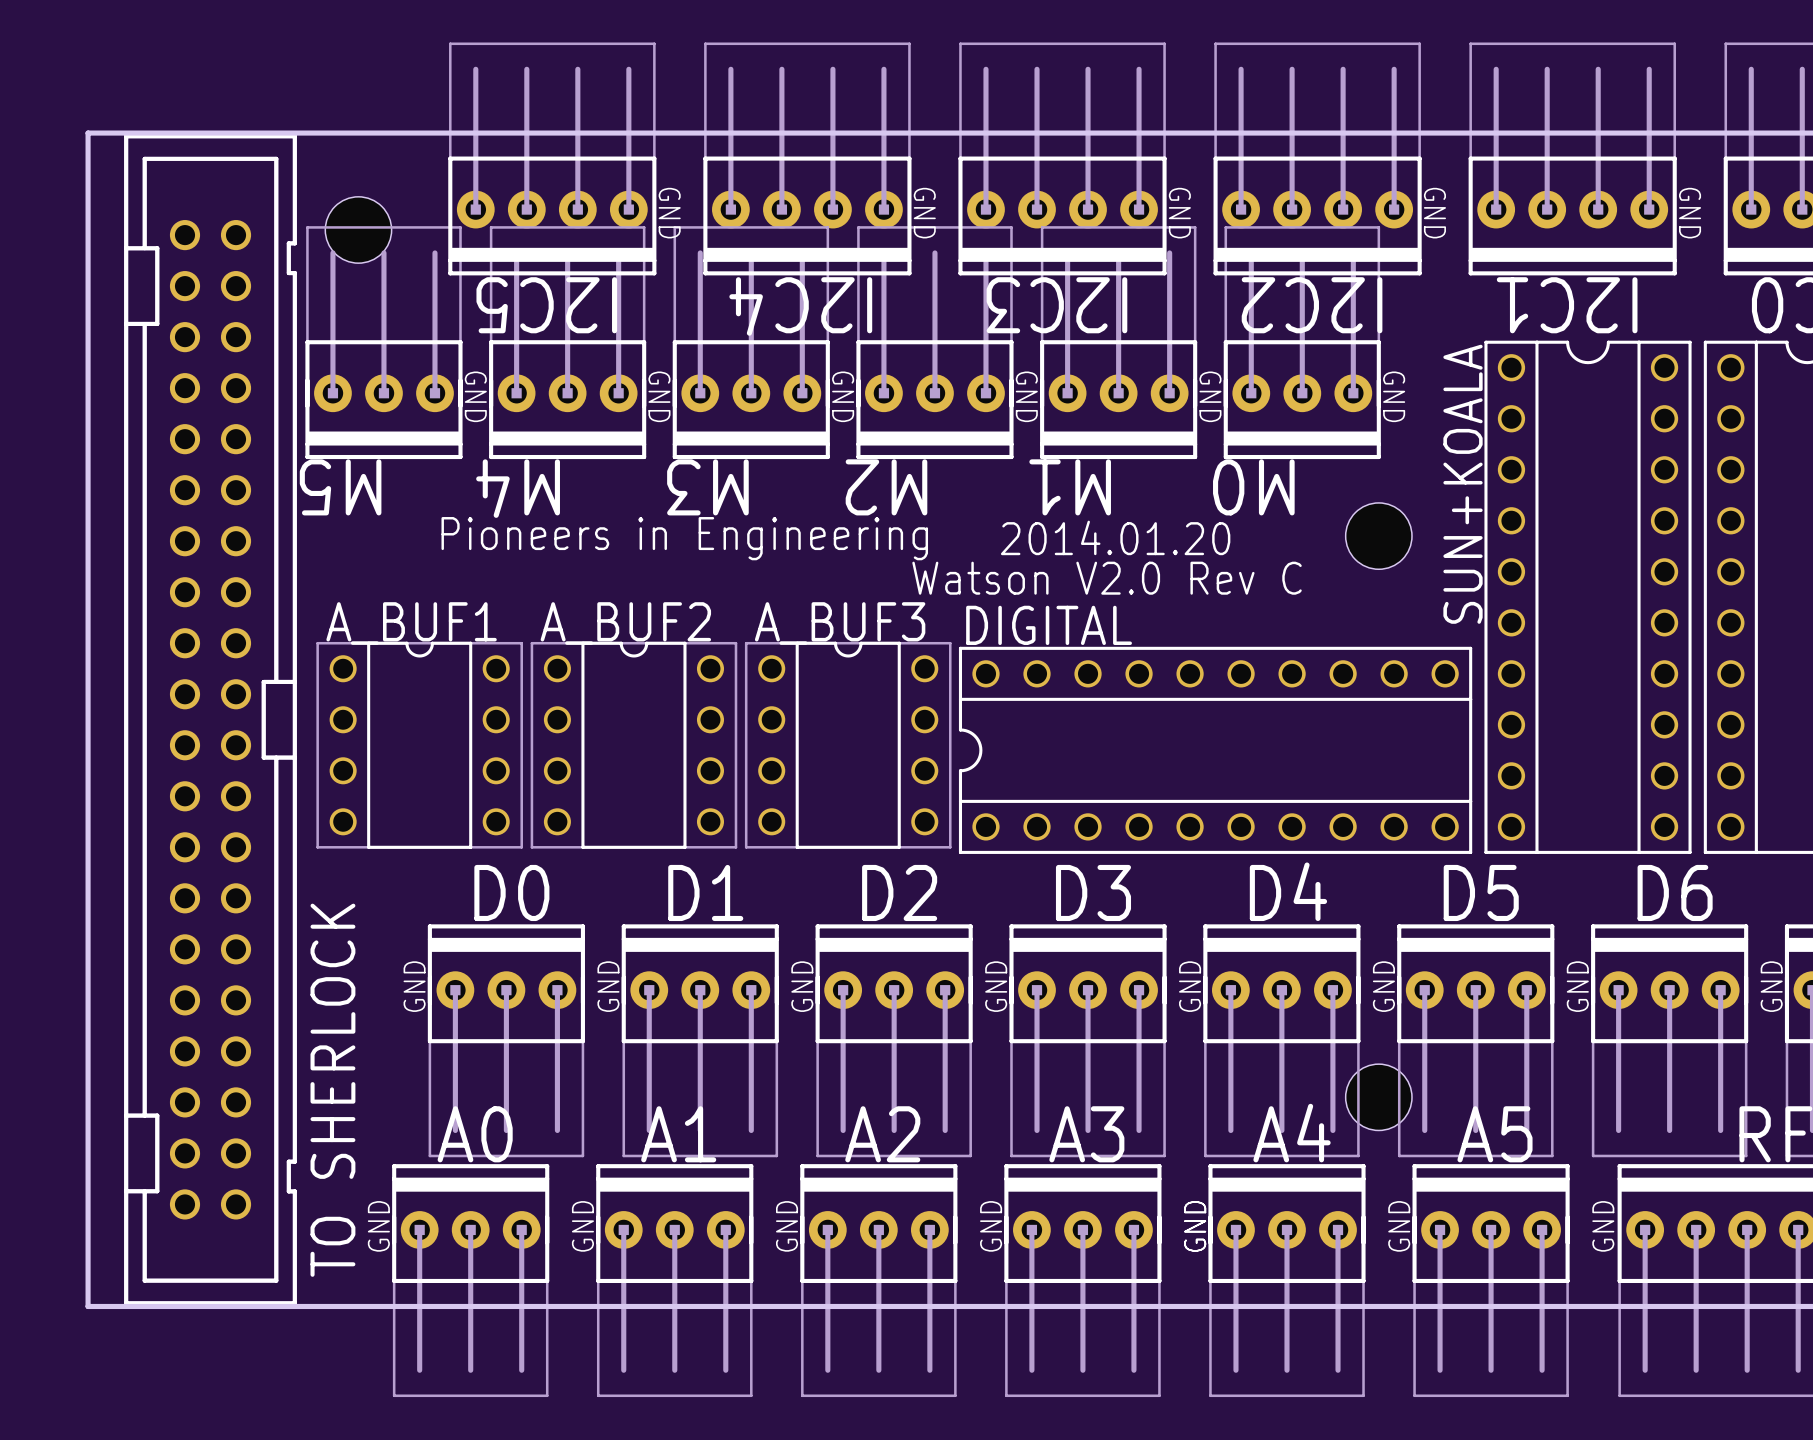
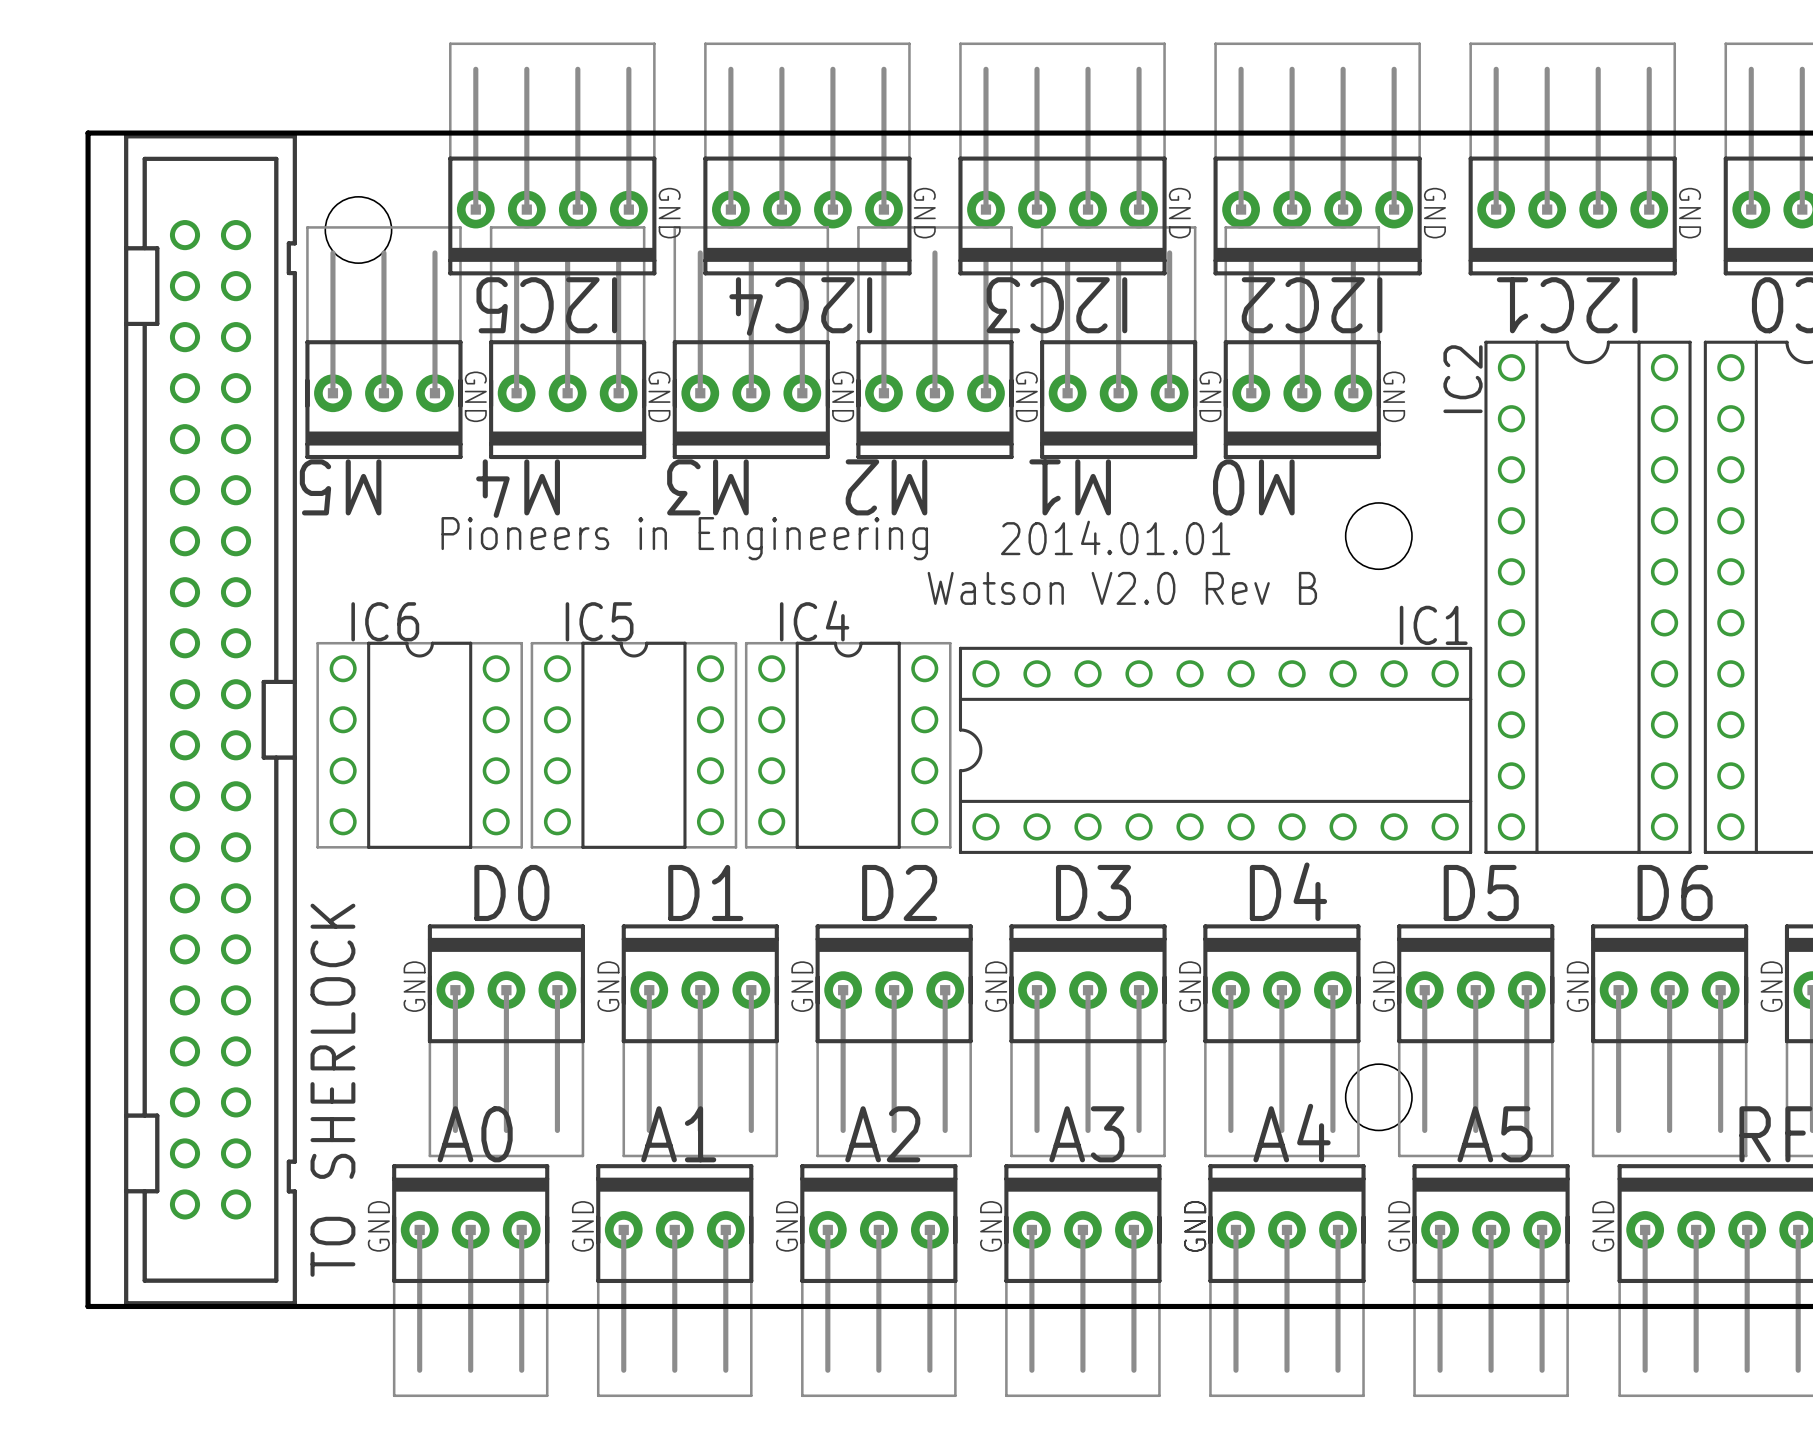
SUN+KOALA name: SUN+KOALA (1463, 484) -> IC2 (1463, 379)
text: 2014.01.20 (1115, 537) -> 2014.01.01 (1115, 537)
text: Watson V2.0 Rev C (1107, 578) -> Watson V2.0 Rev B (1122, 588)
A_BUF1 name: A_BUF1 (411, 623) -> IC6 (385, 621)
A_BUF2 name: A_BUF2 (625, 623) -> IC5 (599, 621)
A_BUF3 name: A_BUF3 (840, 623) -> IC4 (814, 620)
DIGITAL name: DIGITAL (1049, 625) -> IC1 (1433, 625)

